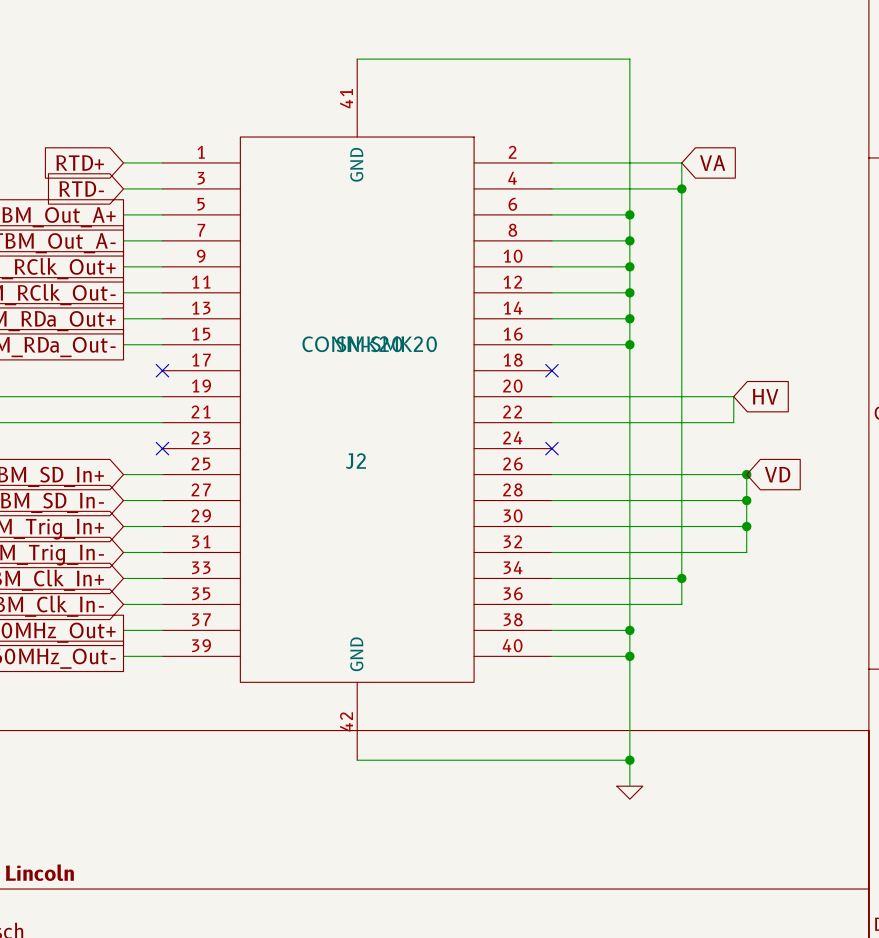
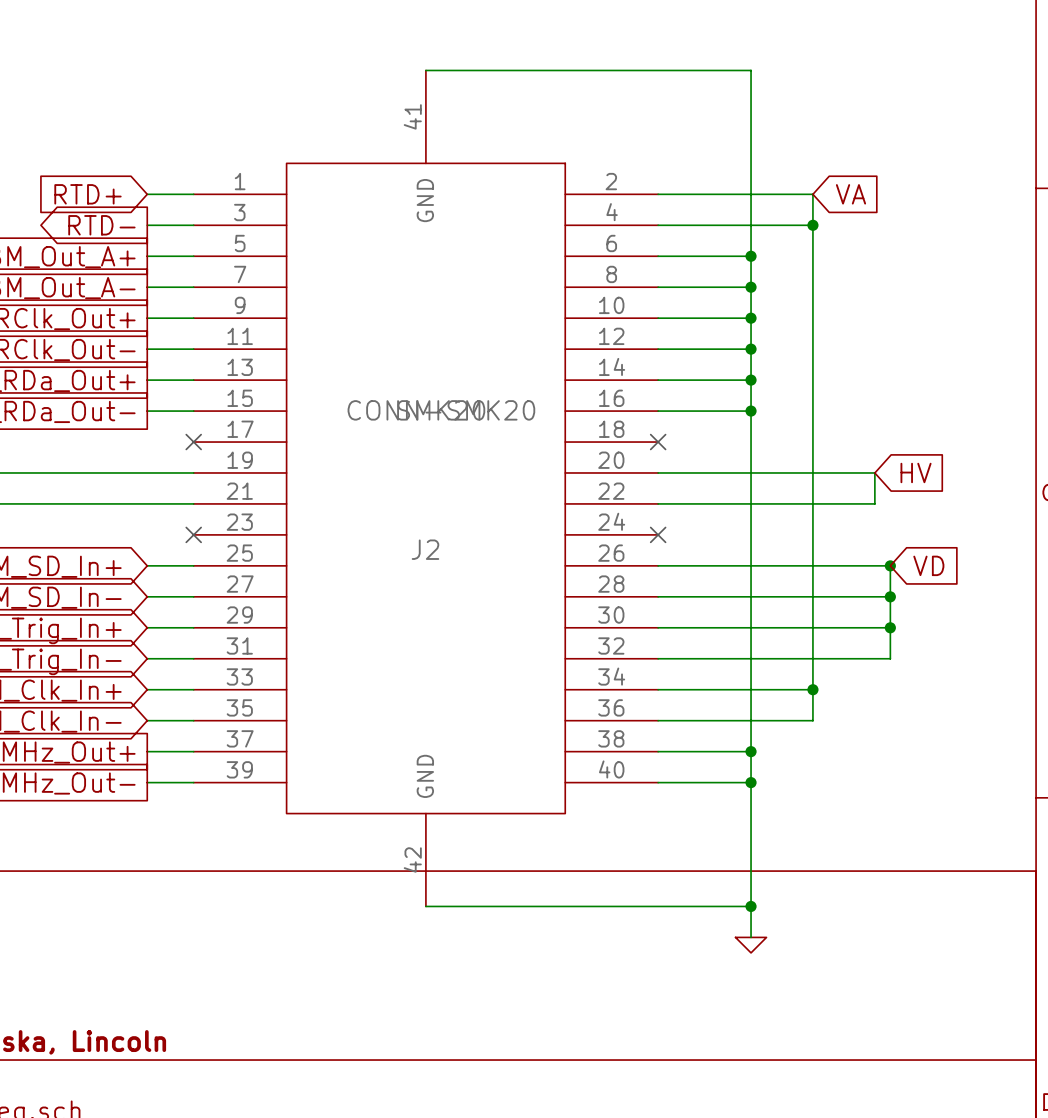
global label shape: input (81, 188) -> output (101, 225)

